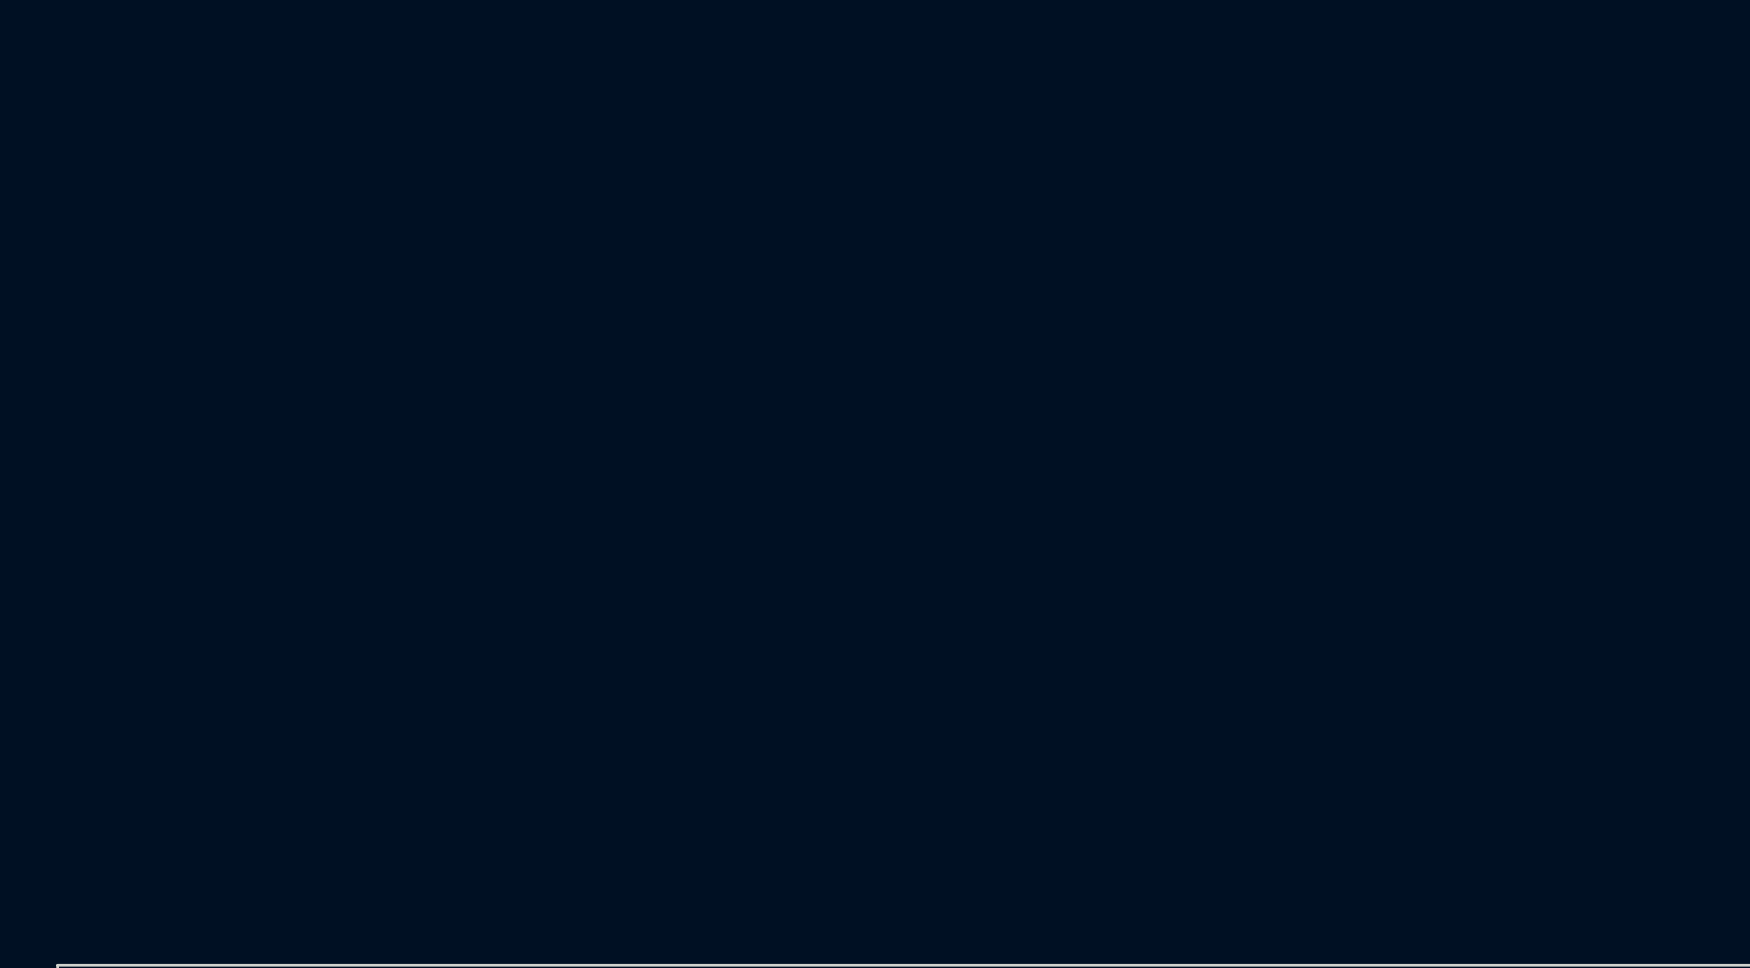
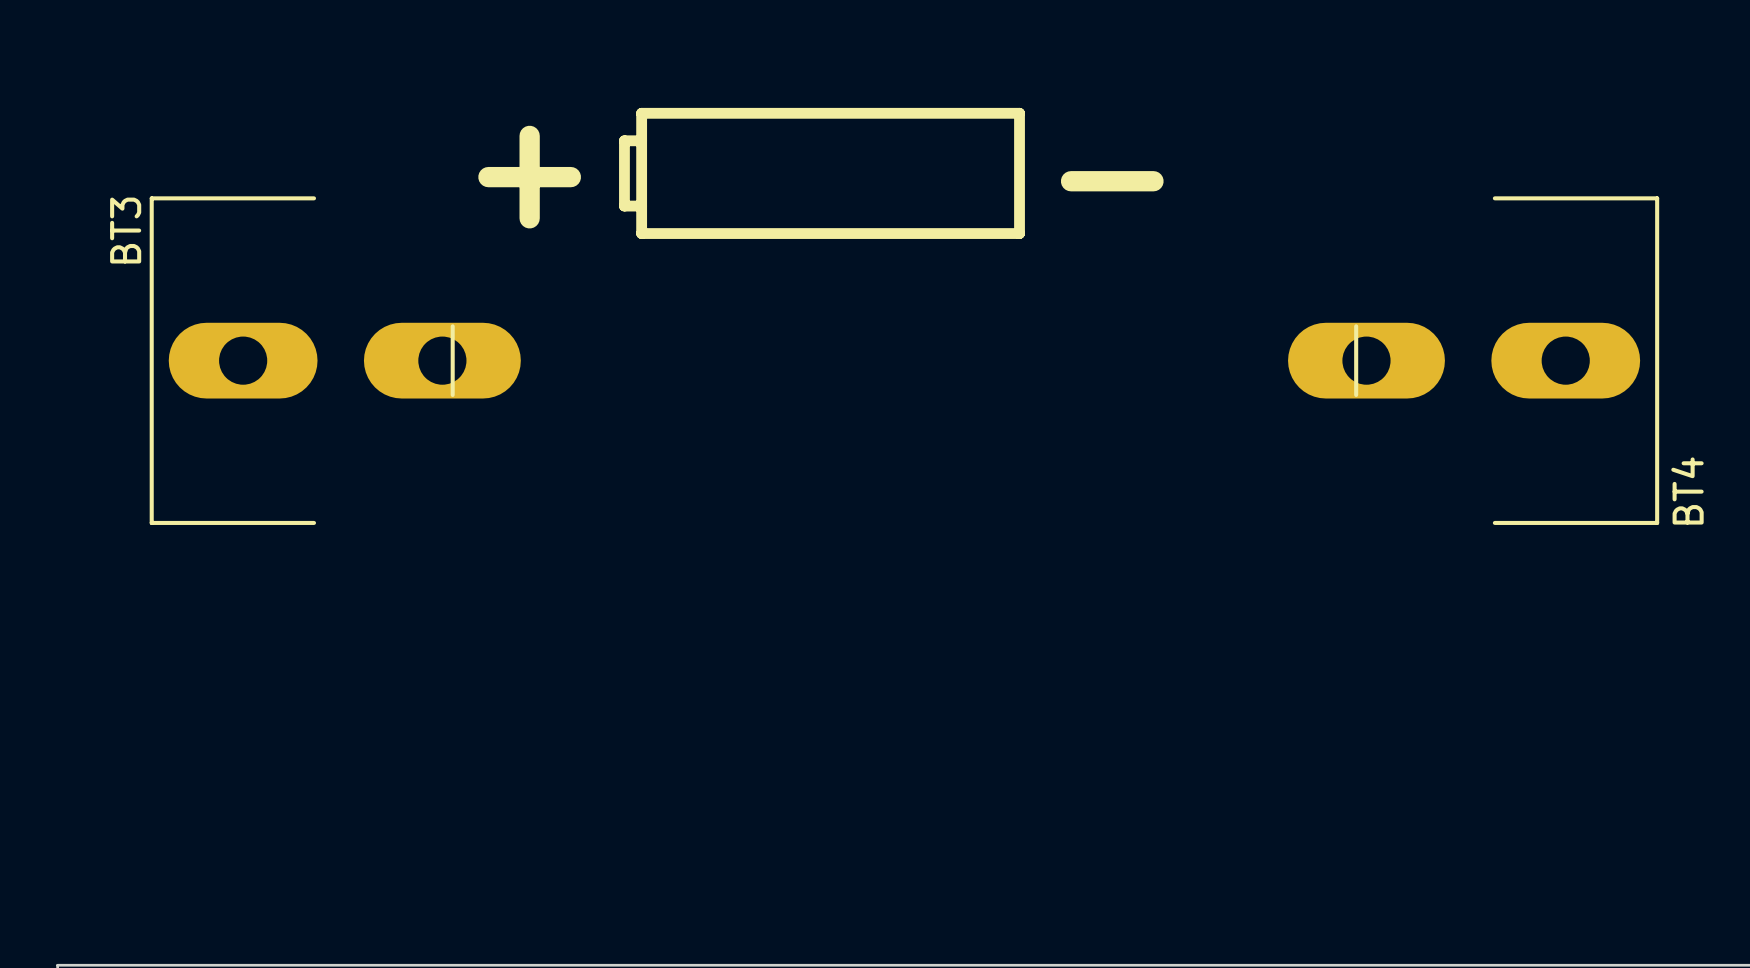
line: none -> (641, 113) (1019, 113) (1019, 233) (641, 233) (641, 113)
line: none -> (641, 140) (624, 140) (624, 206) (641, 206)
text: none -> + (529, 177)
text: none -> - (1112, 181)
BT3: none -> (753, 360)
BT4: none -> (1054, 360)

